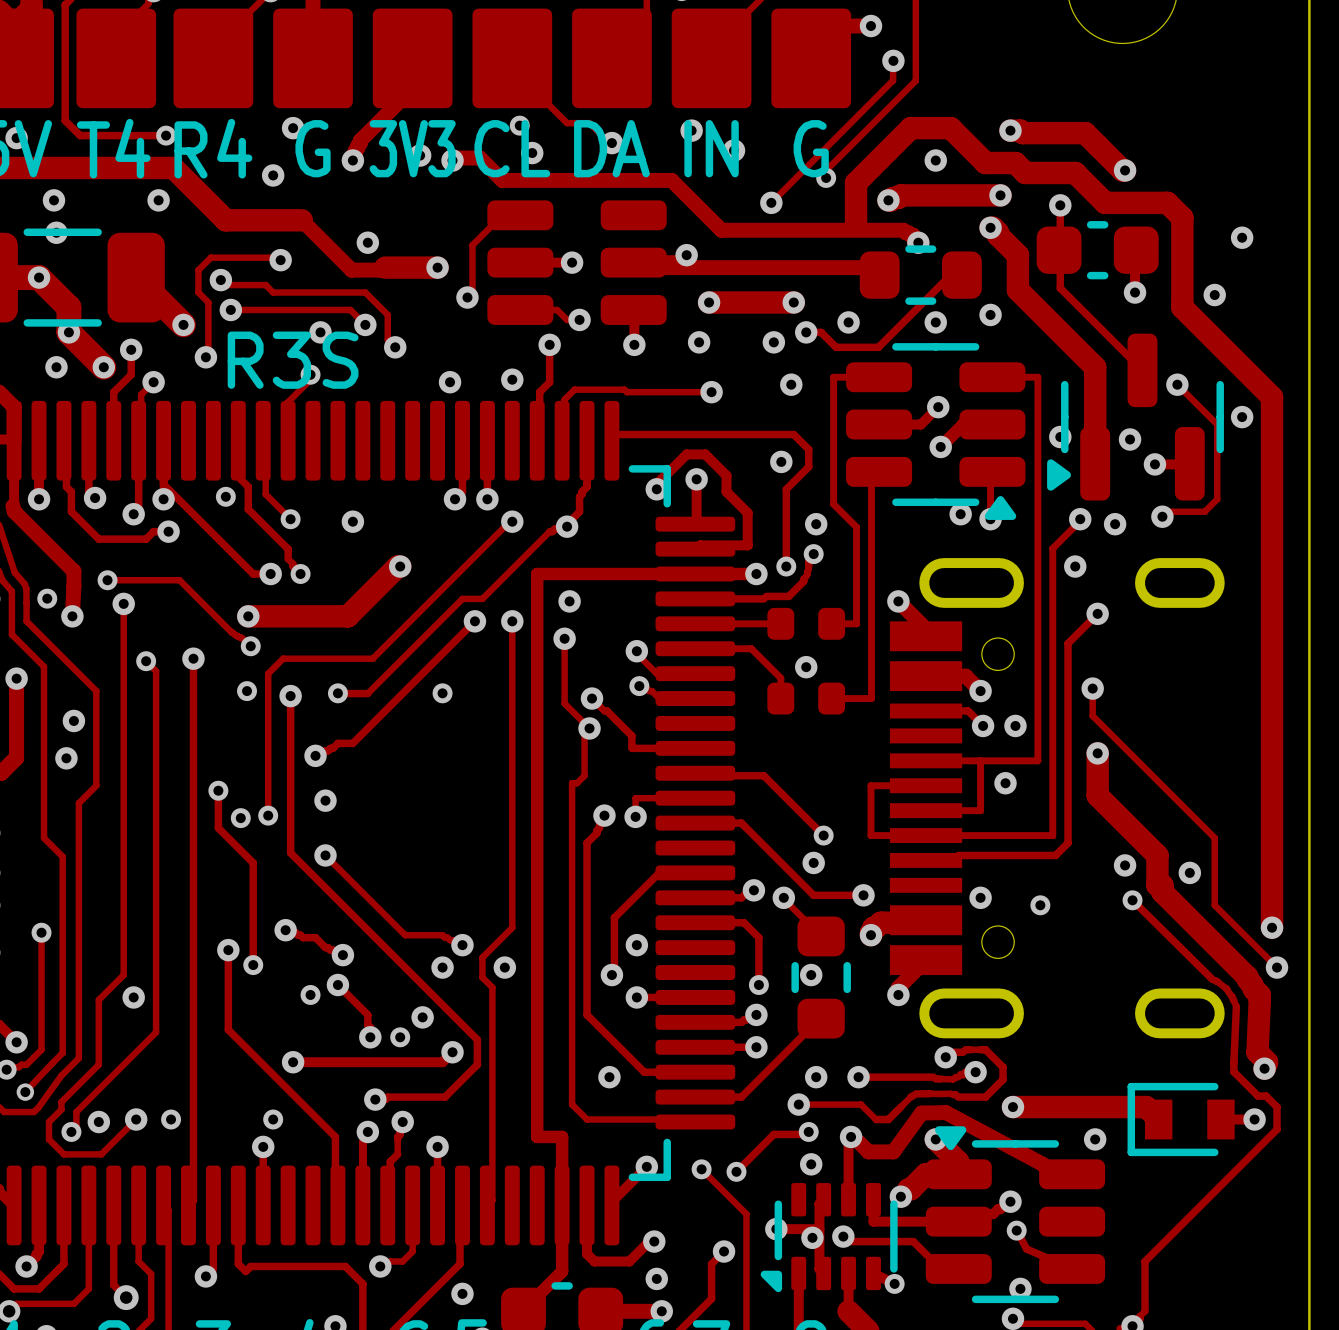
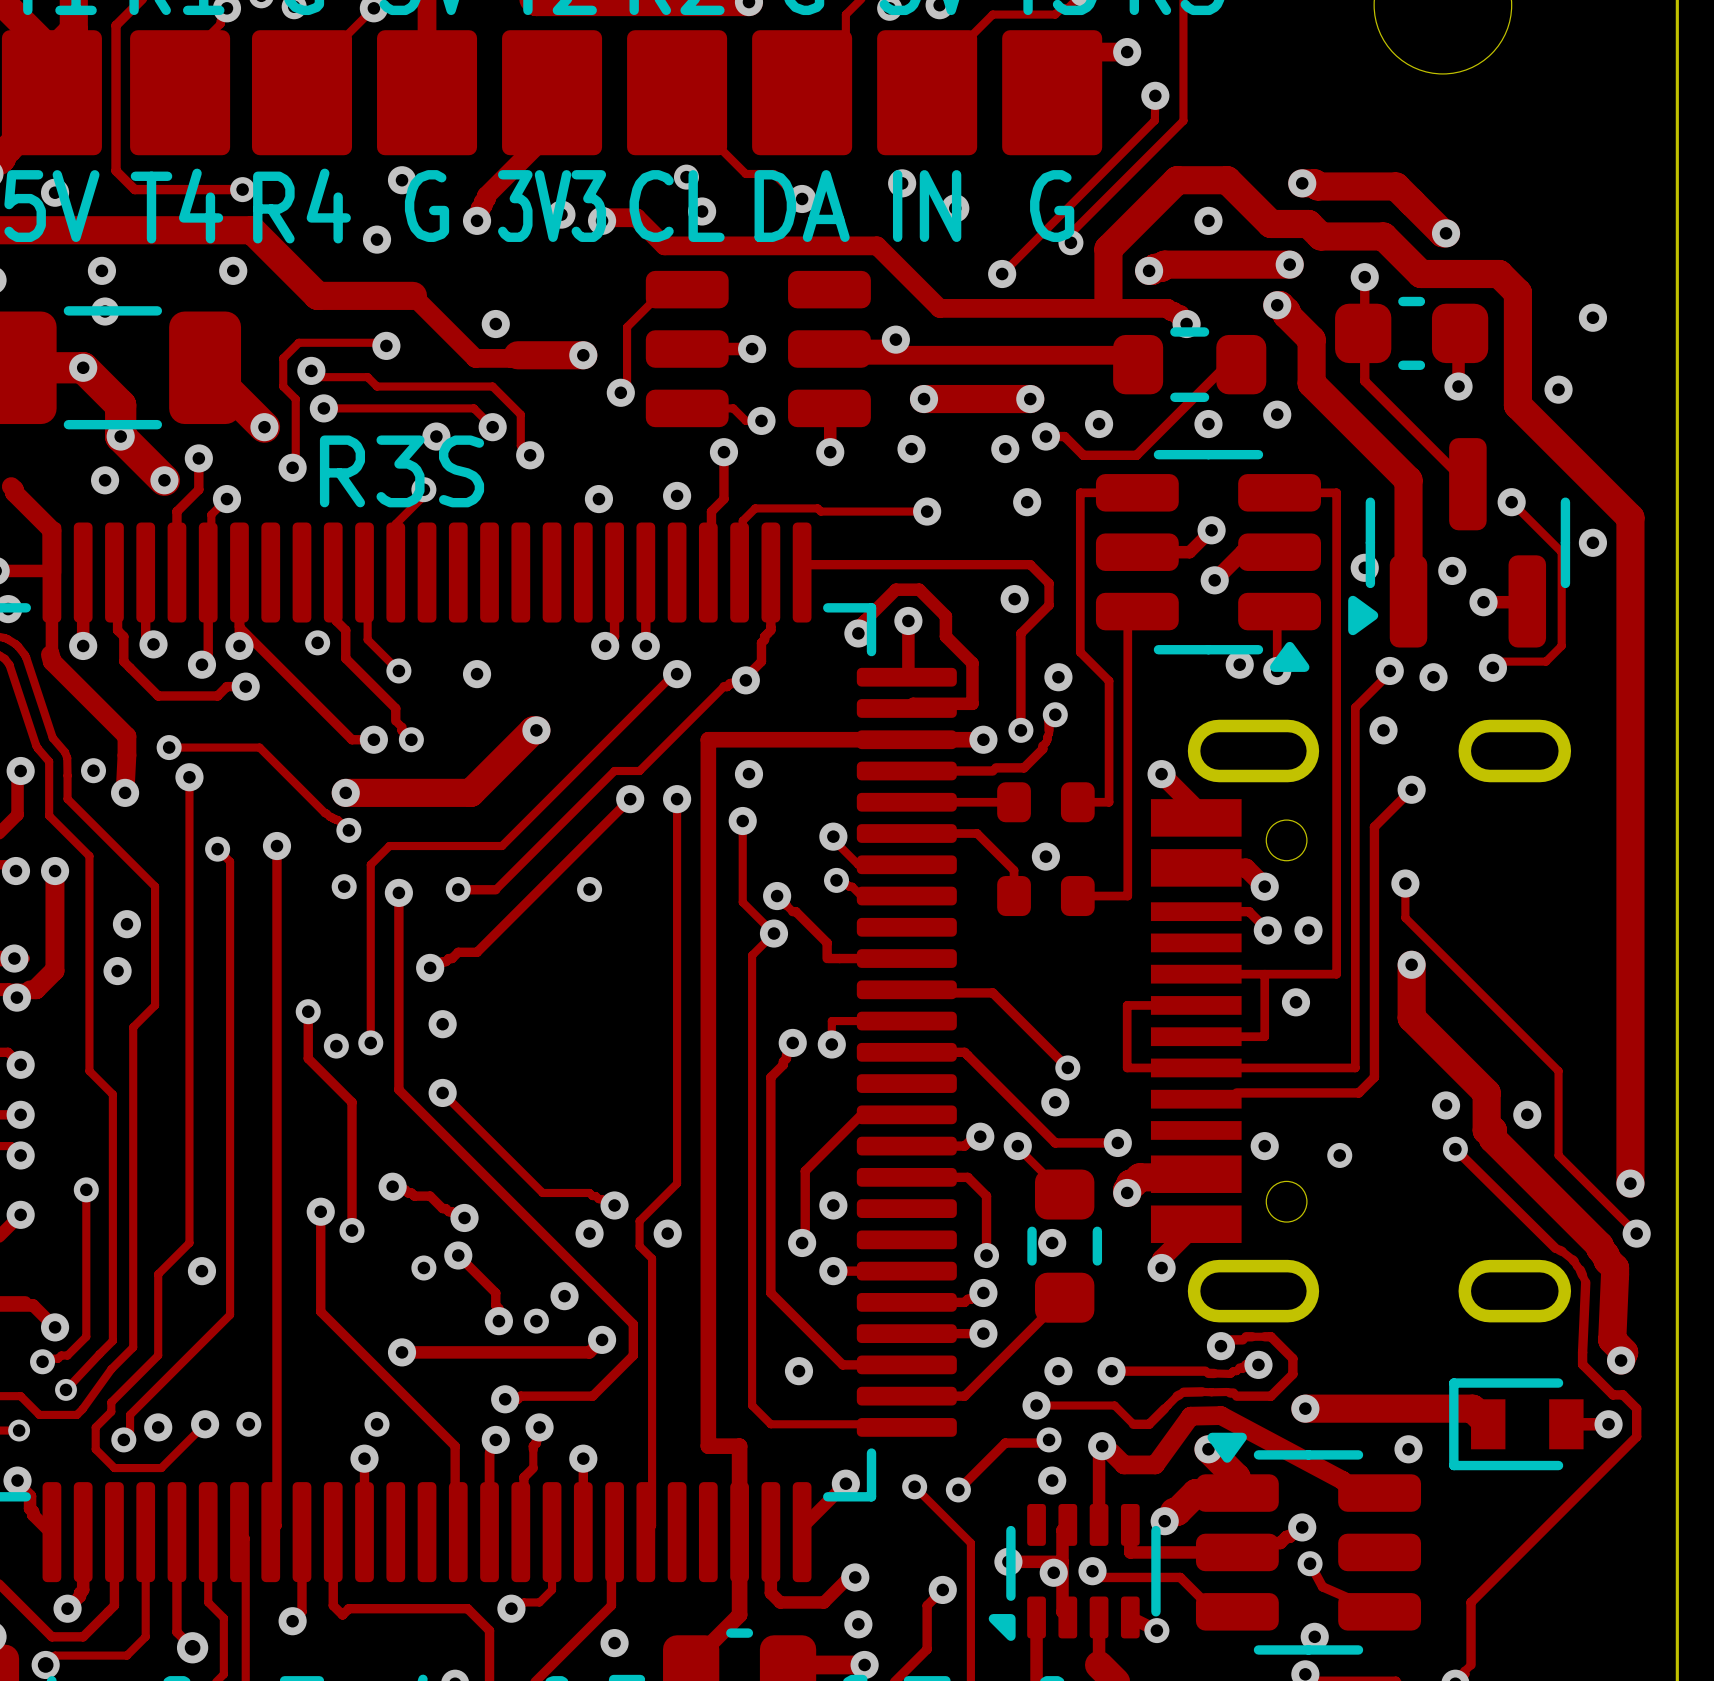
track: (584, 735) (584, 775) (577, 783) (572, 783) -> (773, 933) (752, 955) (752, 1002)

